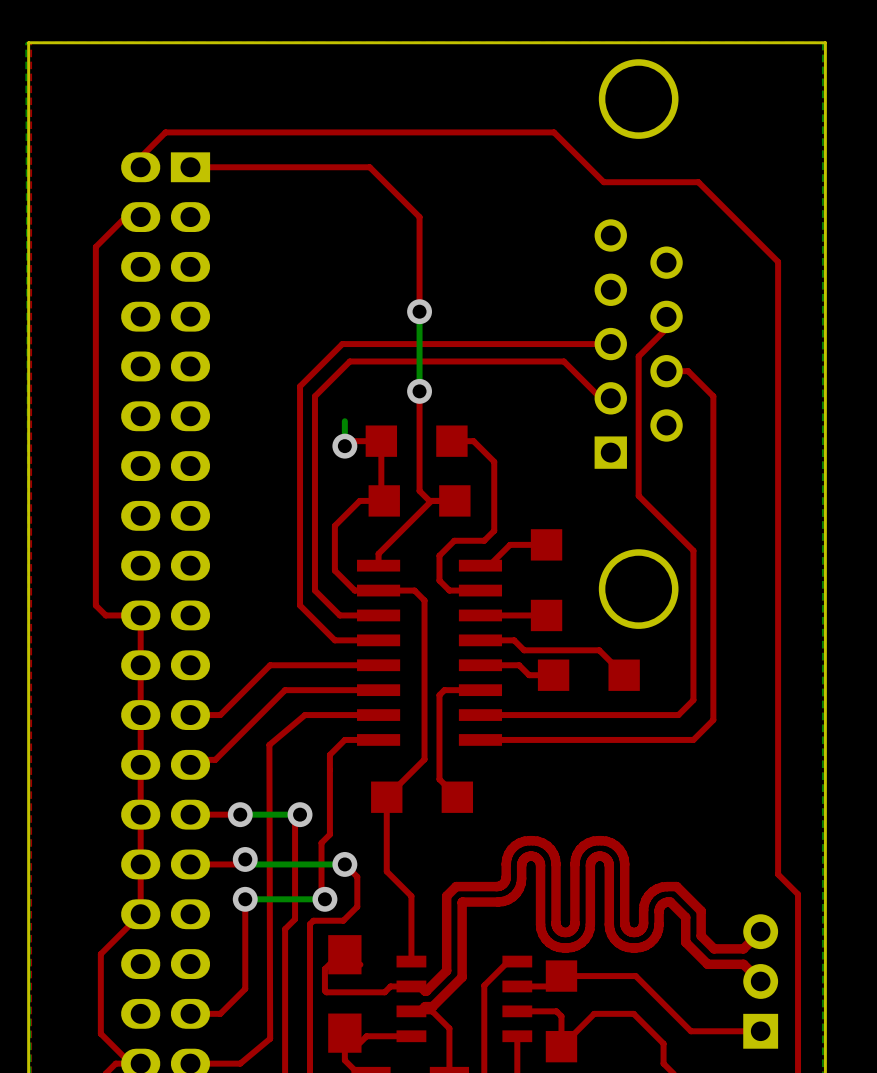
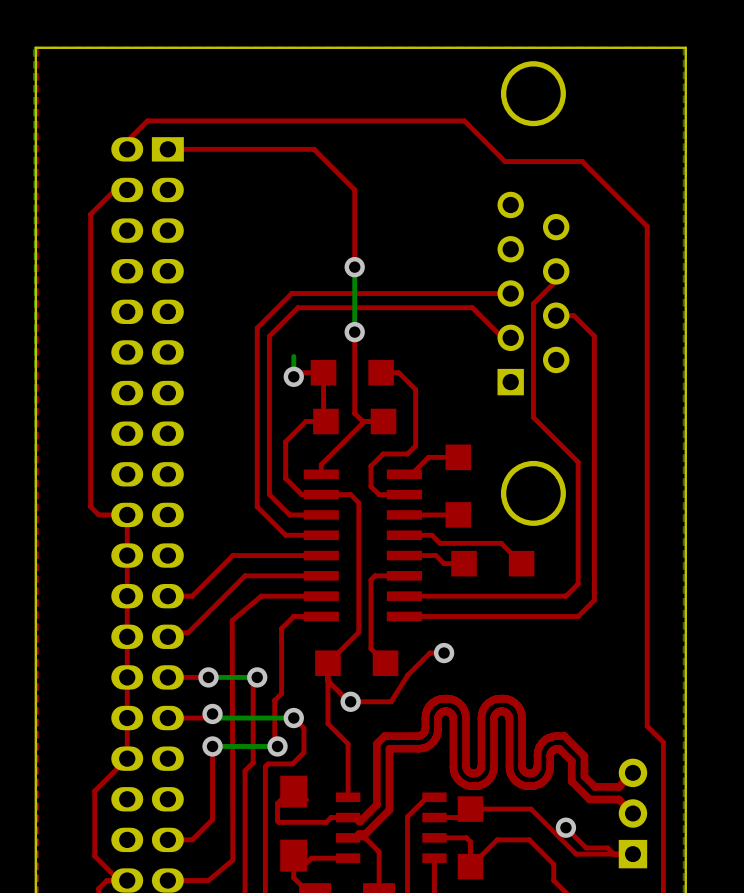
top track: none -> (444, 653) (429, 653) (407, 675) (391, 701) (348, 701) (327, 680)
via: none -> (444, 653)
via: none -> (350, 701)
top track: none -> (565, 827) (586, 848) (607, 848) (613, 854)
via: none -> (565, 827)

